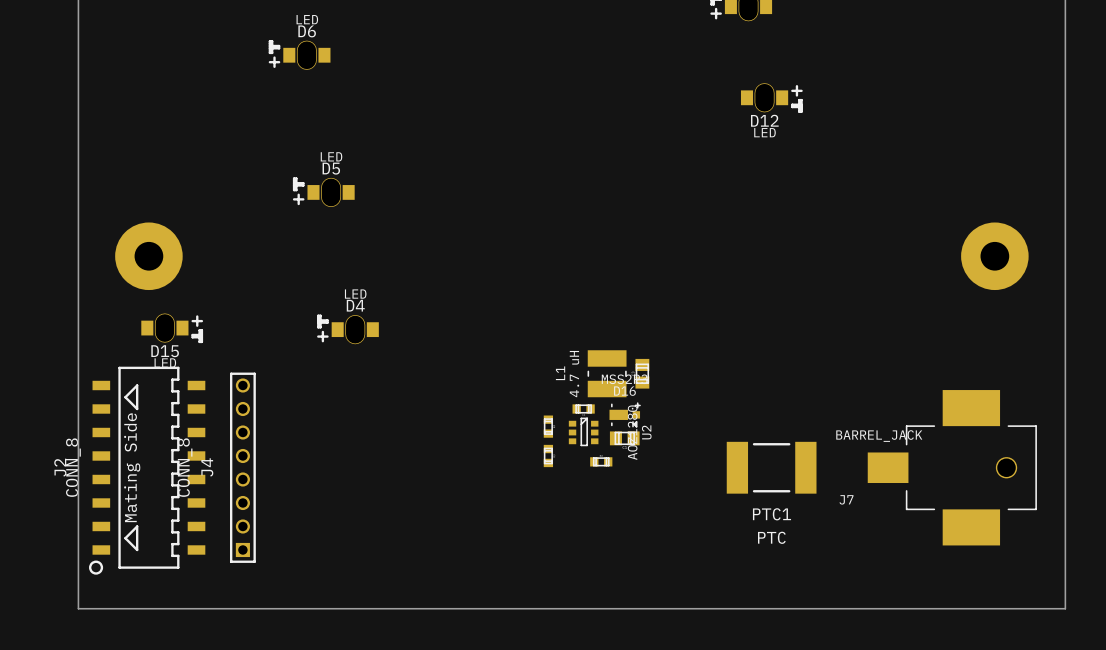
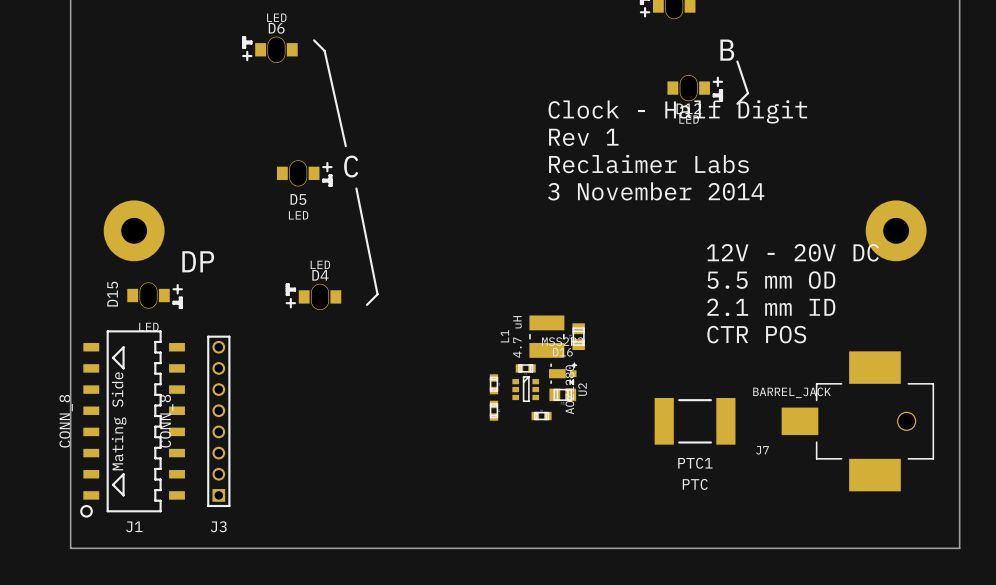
line: none -> (314, 40) (324, 50) (345, 146)
text: none -> B (727, 50)
line: none -> (737, 61) (747, 93) (737, 103)
text: none -> Clock - Half Digit (677, 111)
text: none -> Rev 1 (583, 137)
text: none -> Reclaimer Labs (648, 163)
text: none -> C (351, 166)
D5 rotation: 0° (323, 192) -> 180° (304, 173)
line: none -> (356, 188) (377, 294) (366, 304)
text: none -> 3 November 2014 (656, 191)
text: none -> 12V - 20V DC (792, 252)
text: none -> DP (198, 261)
text: none -> 5.5 mm OD (771, 280)
text: none -> 2.1 mm ID (771, 307)
D15 name rotation: 0° (165, 351) -> 90° counterclockwise (112, 294)
D15 name position: D15 (165, 351) -> D15 (112, 294)
text: none -> CTR POS (756, 334)
J2 name: J2 (60, 467) -> J1 (134, 526)
J4 name: J4 (207, 467) -> J3 (218, 526)

